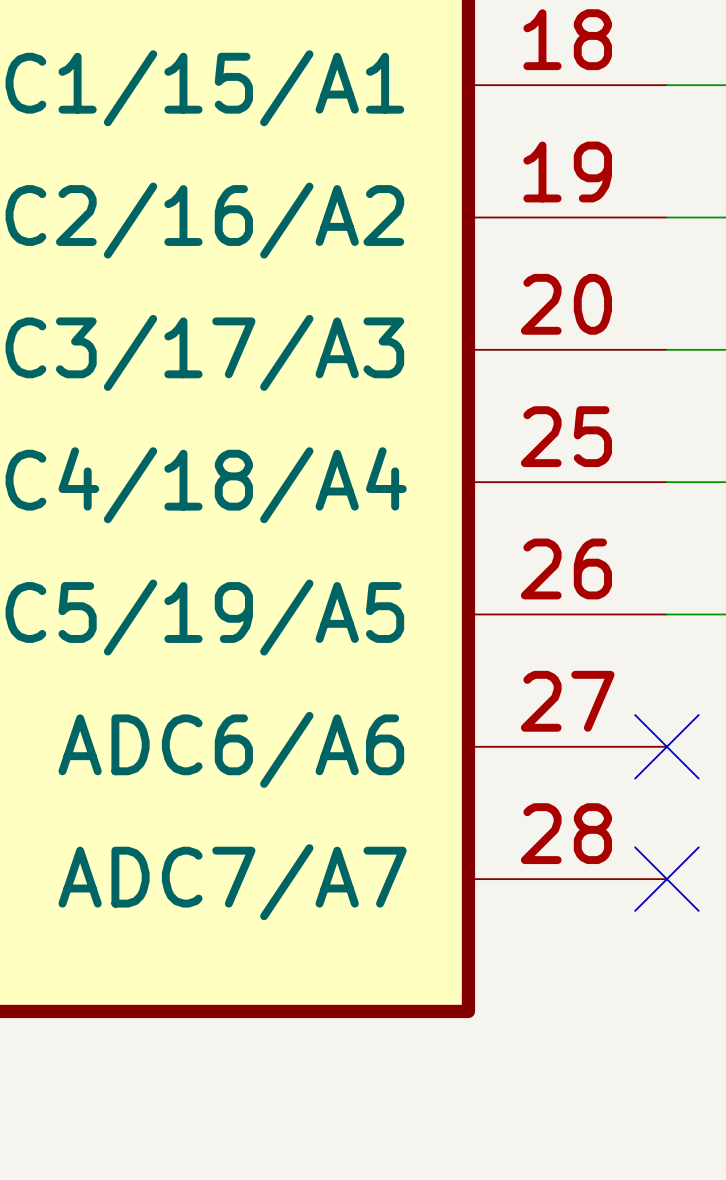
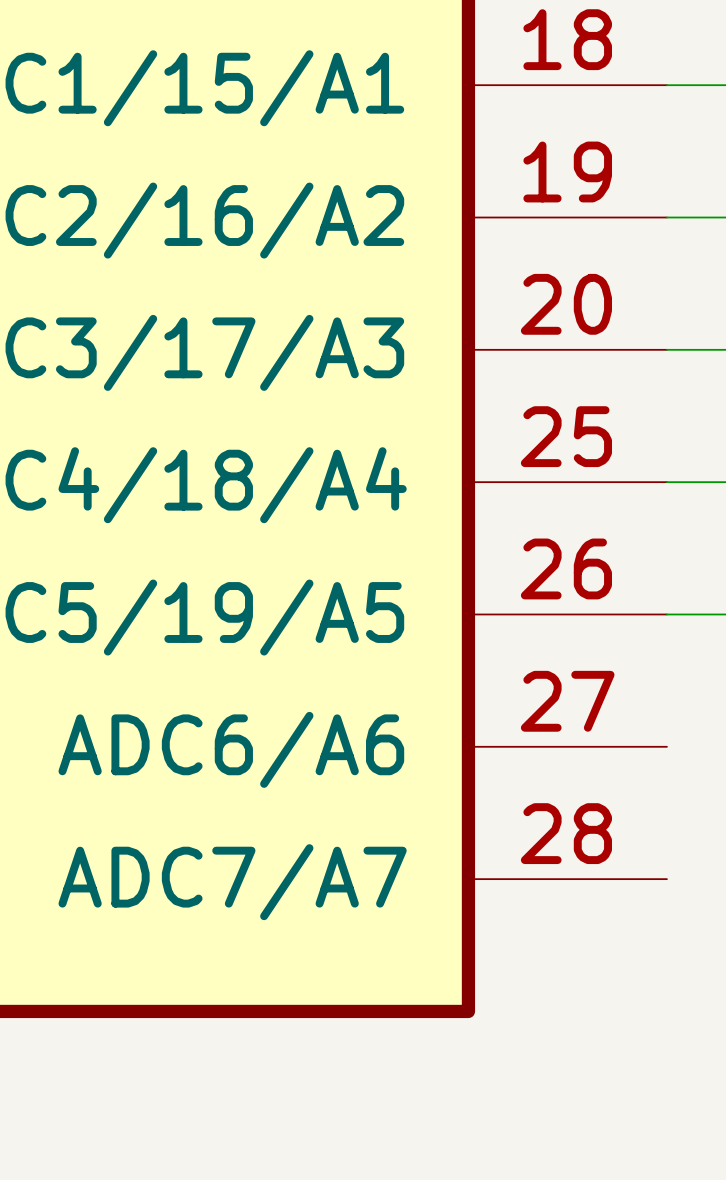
no-connect mark: (666, 746) -> none
no-connect mark: (666, 879) -> none

